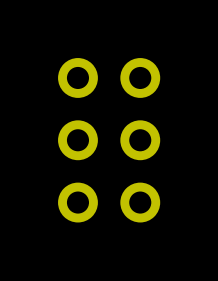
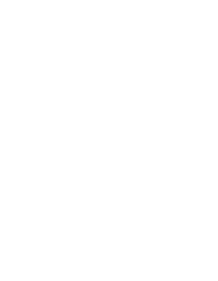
part: (109, 140) -> none

